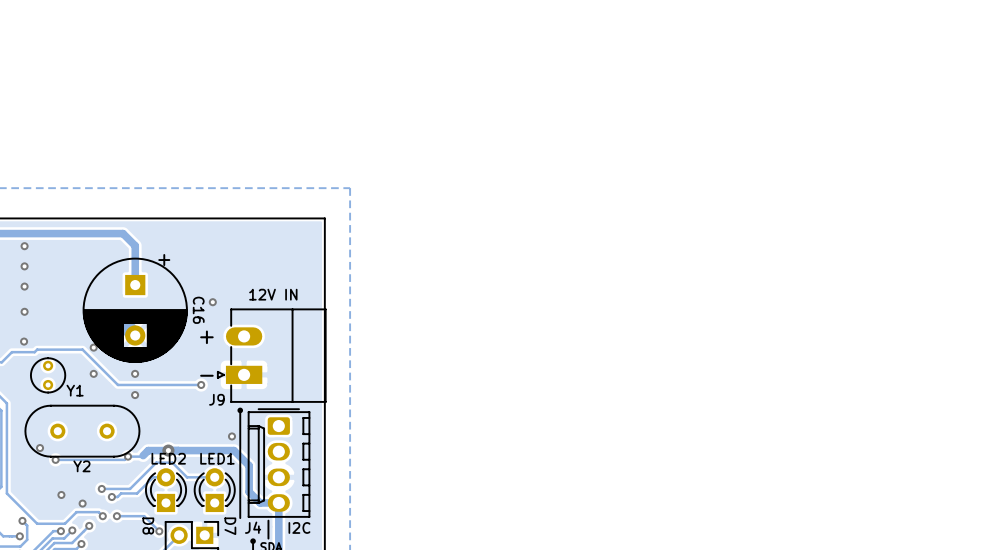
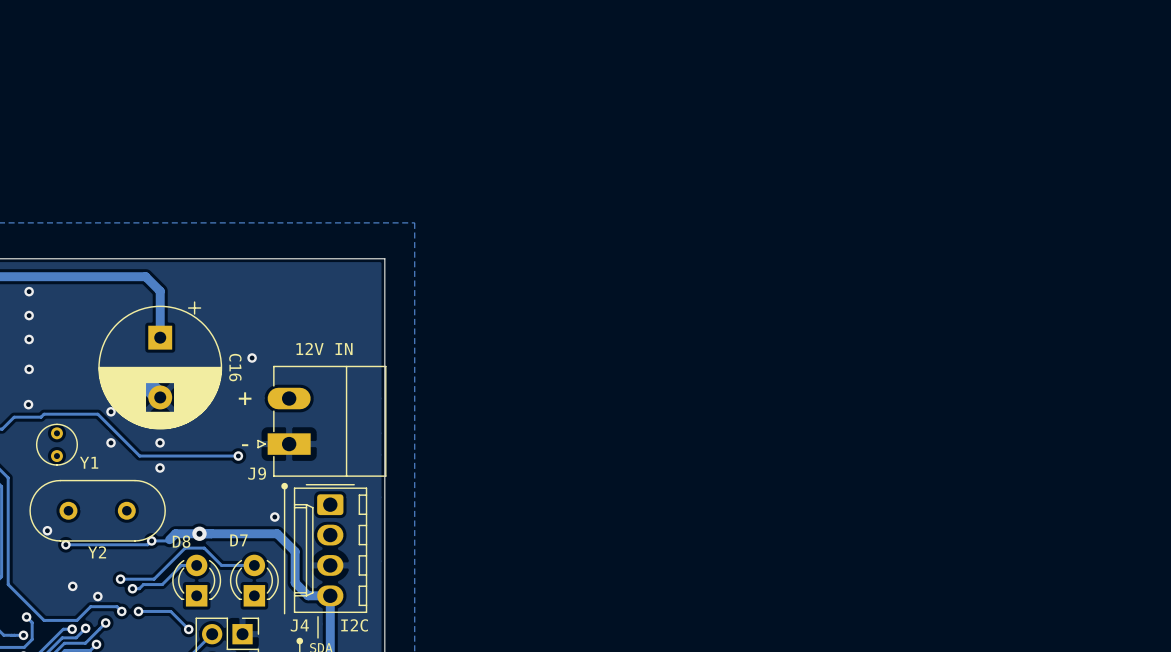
text: LED2 (168, 458) -> none
text: LED1 (217, 458) -> none
D8 name rotation: 0° (148, 526) -> 90° counterclockwise (181, 541)
D8 name position: D8 (148, 526) -> D8 (181, 541)
D7 name rotation: 0° (230, 526) -> 90° counterclockwise (238, 540)
D7 name position: D7 (230, 526) -> D7 (238, 540)

